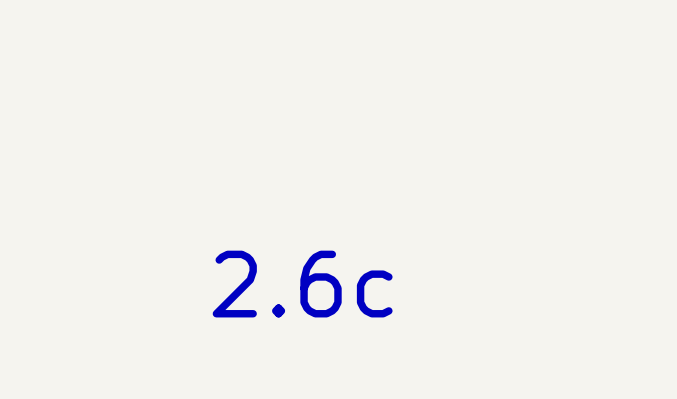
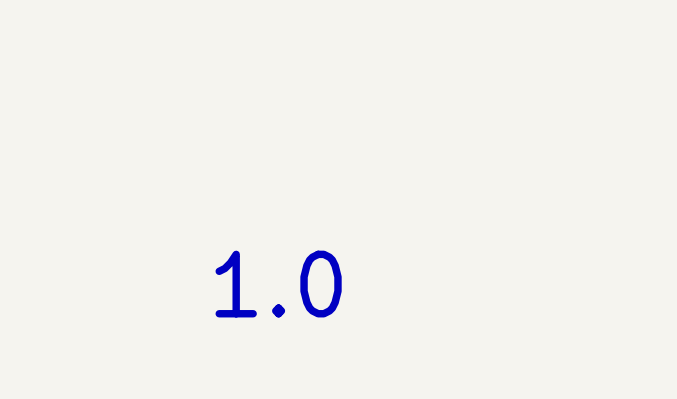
text: 2.6c (302, 284) -> 1.0 (278, 284)

